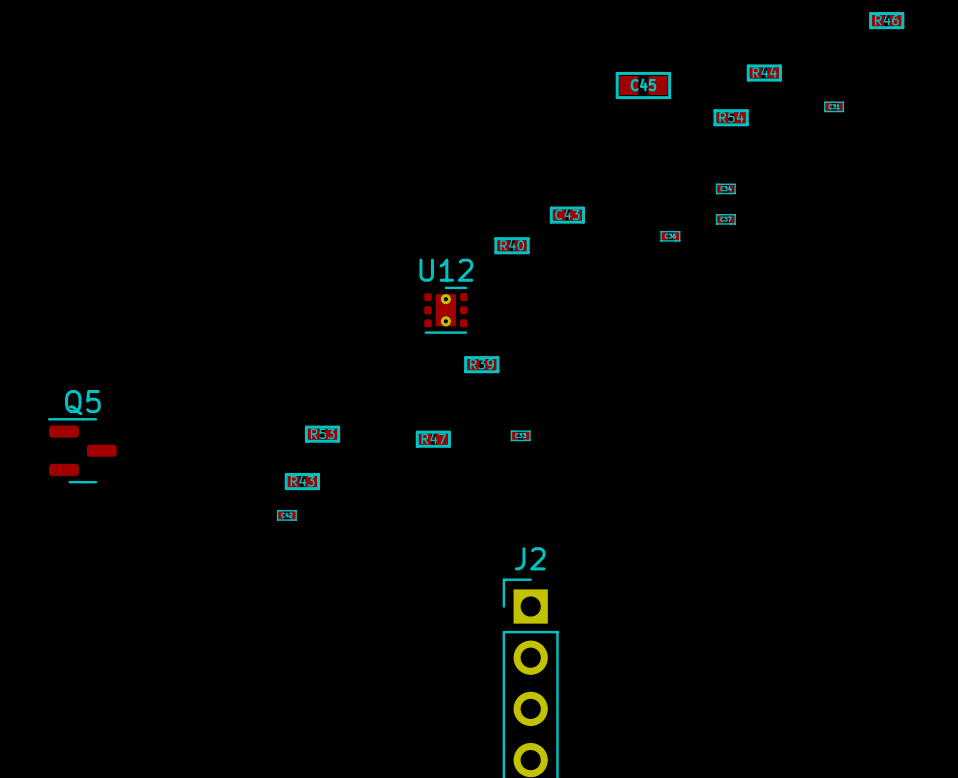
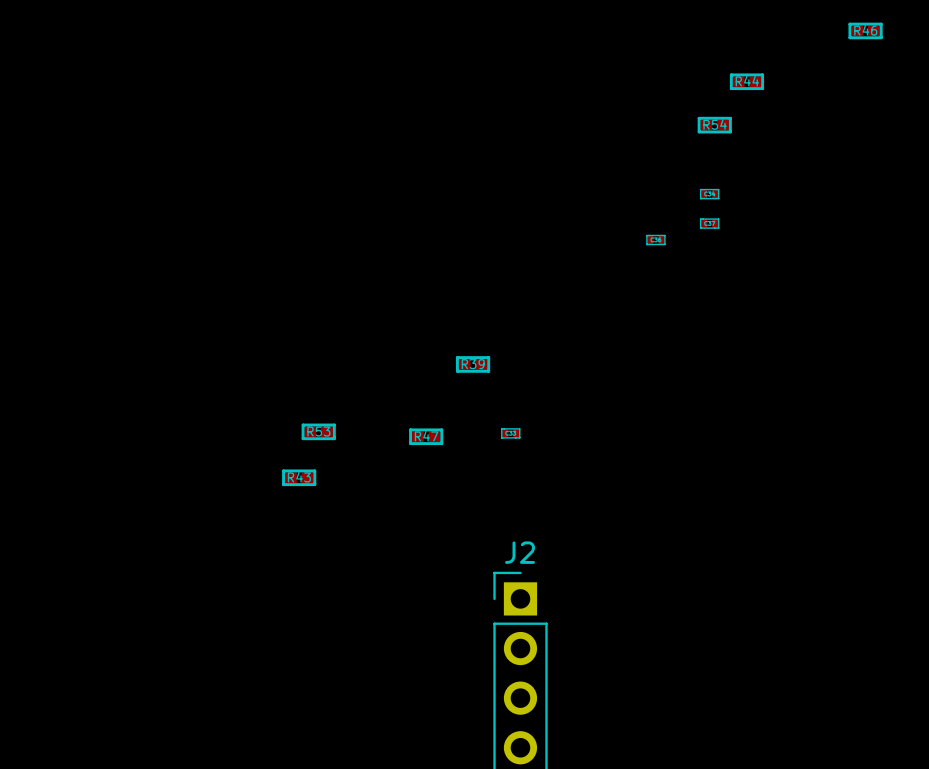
C45: (643, 85) -> none
part: (834, 106) -> none
C43: (567, 215) -> none
R40: (511, 245) -> none
U12: (445, 310) -> none
Q5: (82, 450) -> none
part: (286, 515) -> none

